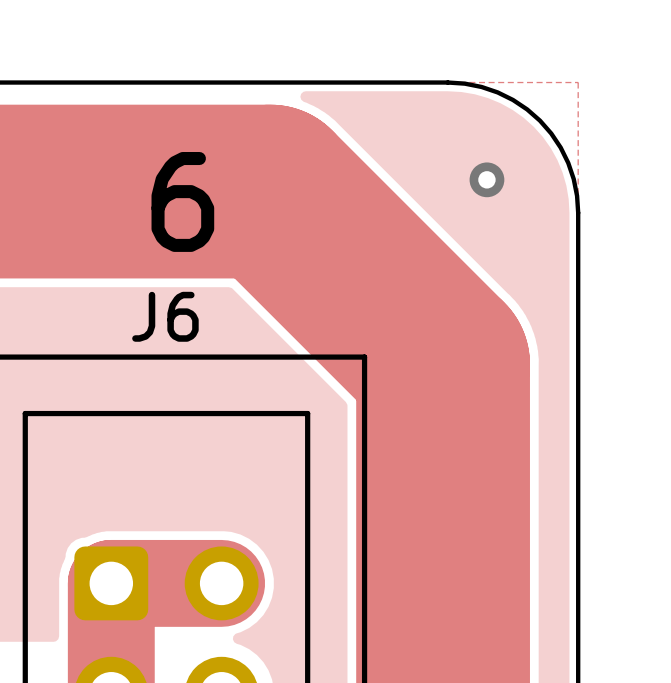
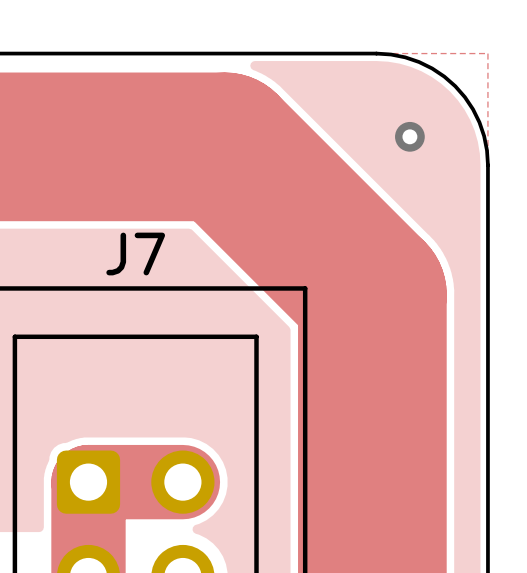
text: 6 (182, 201) -> none
J6 name: J6 (165, 316) -> J7 (135, 254)

